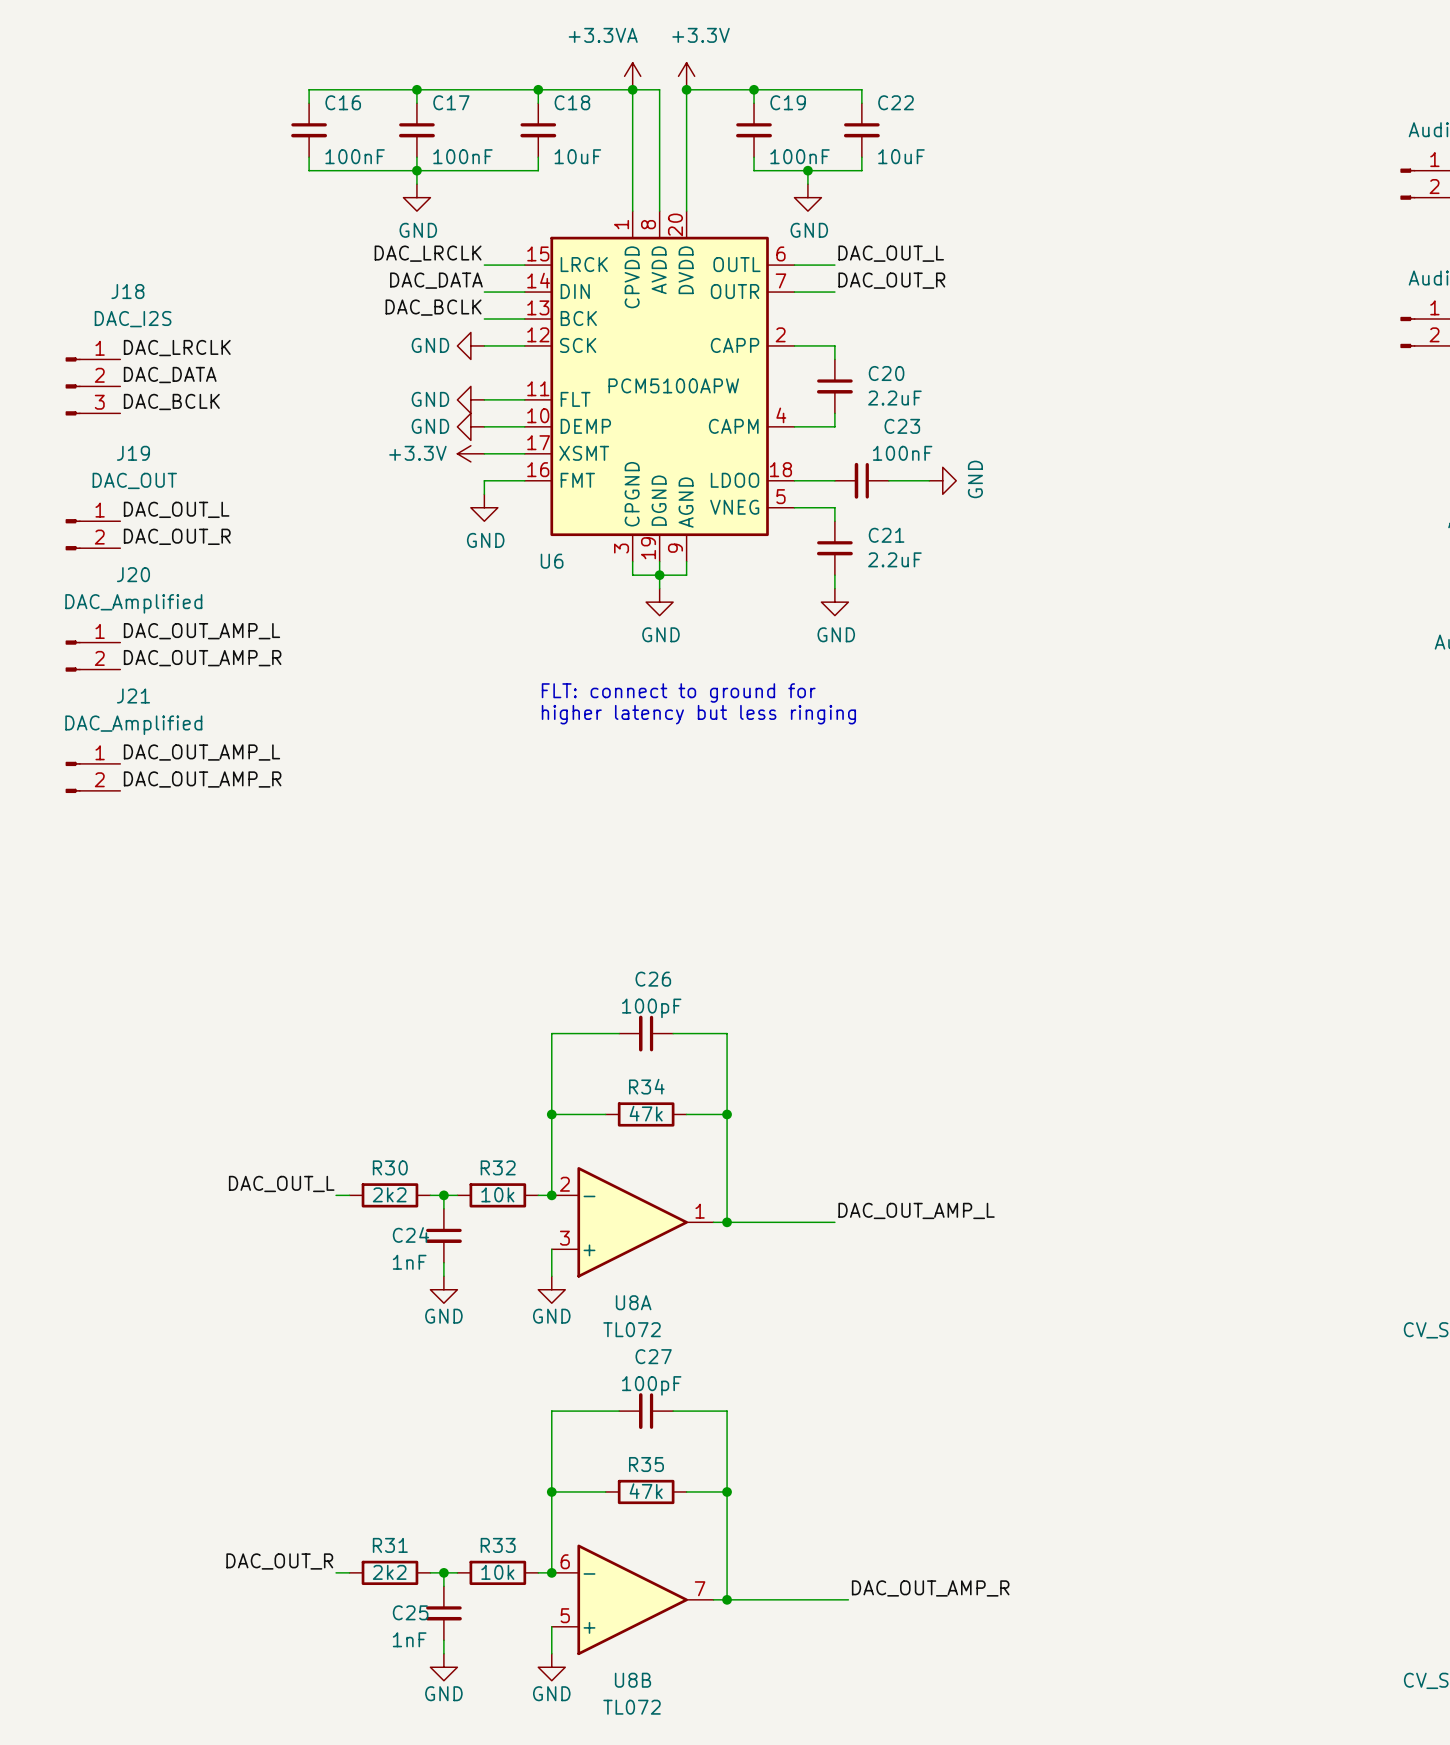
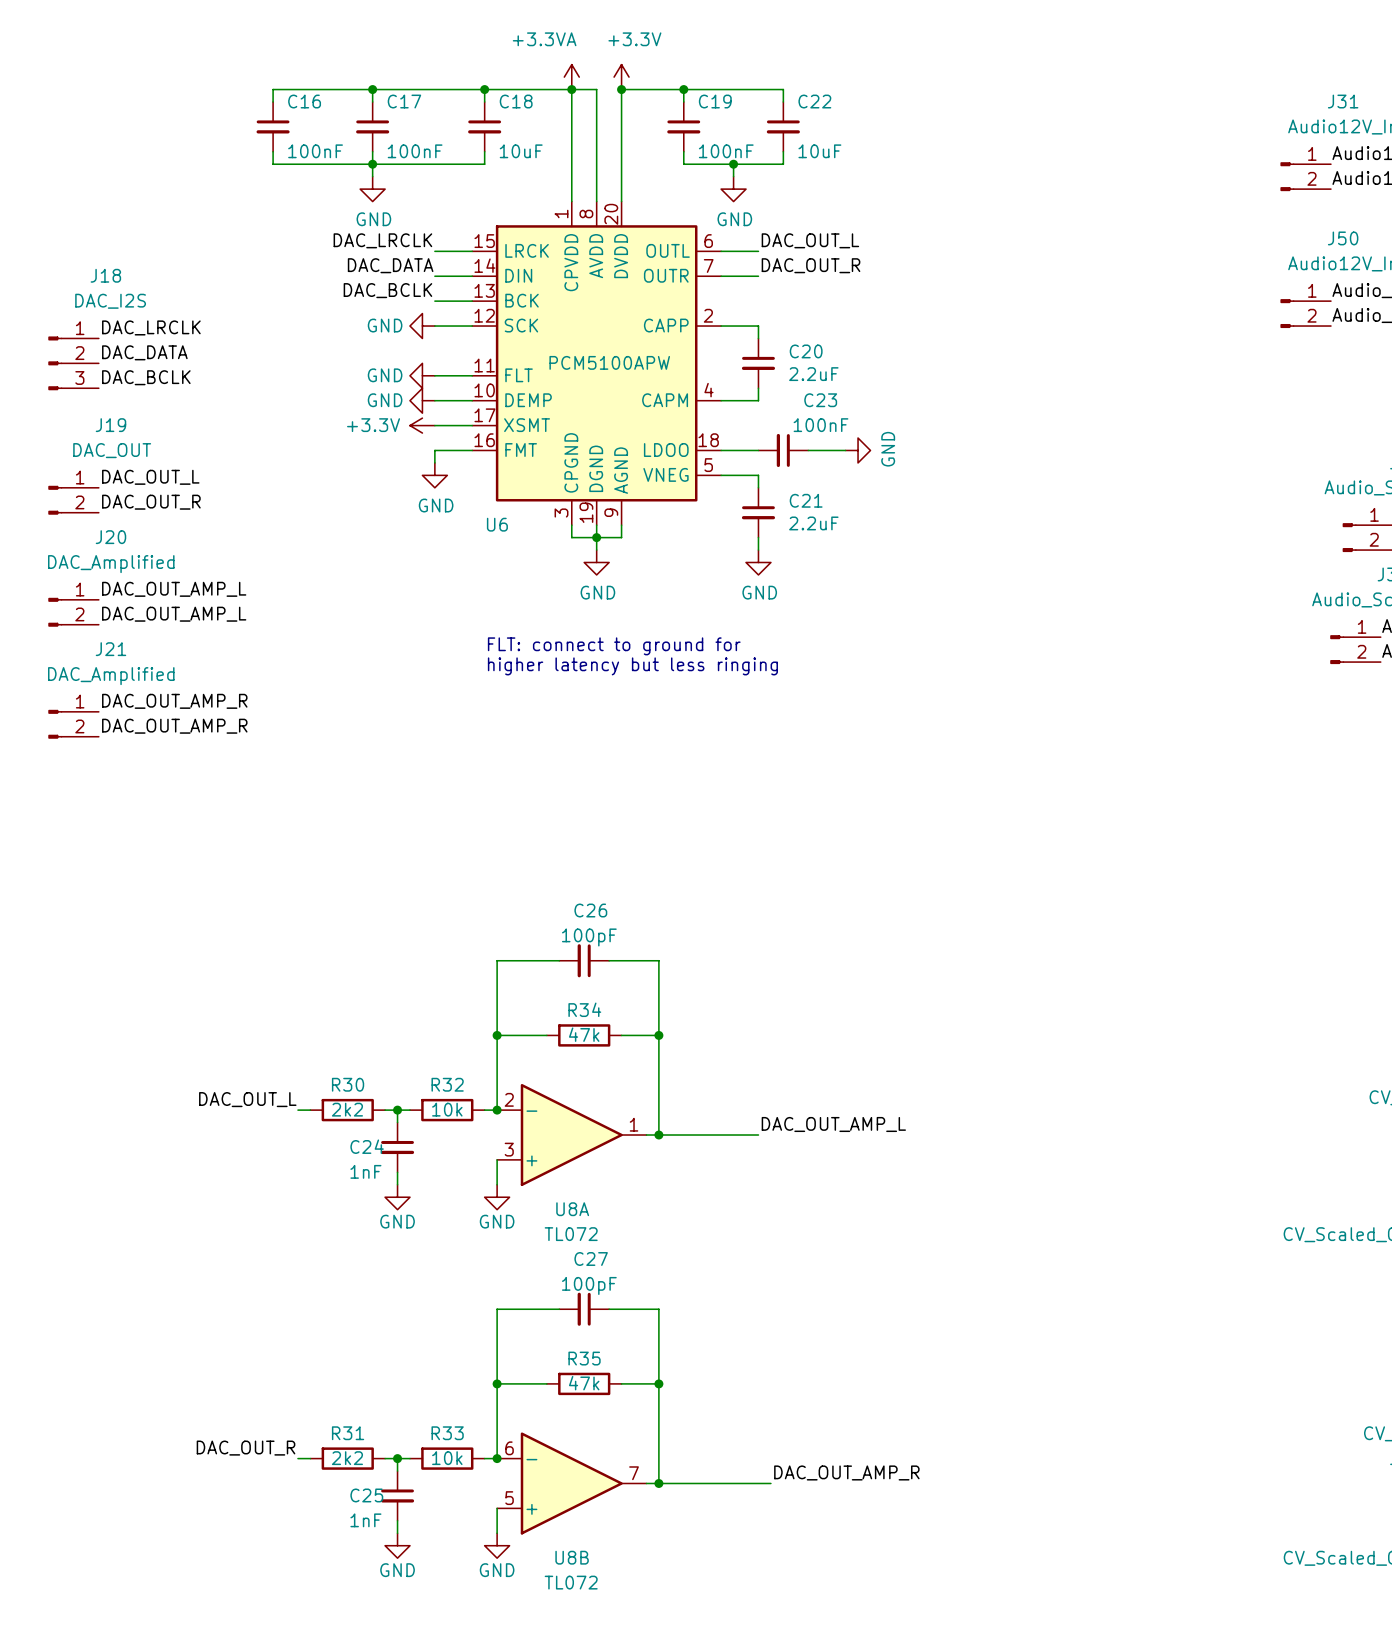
label: DAC_OUT_AMP_R (202, 658) -> DAC_OUT_AMP_L (174, 614)
label: DAC_OUT_AMP_L (201, 752) -> DAC_OUT_AMP_R (174, 701)

